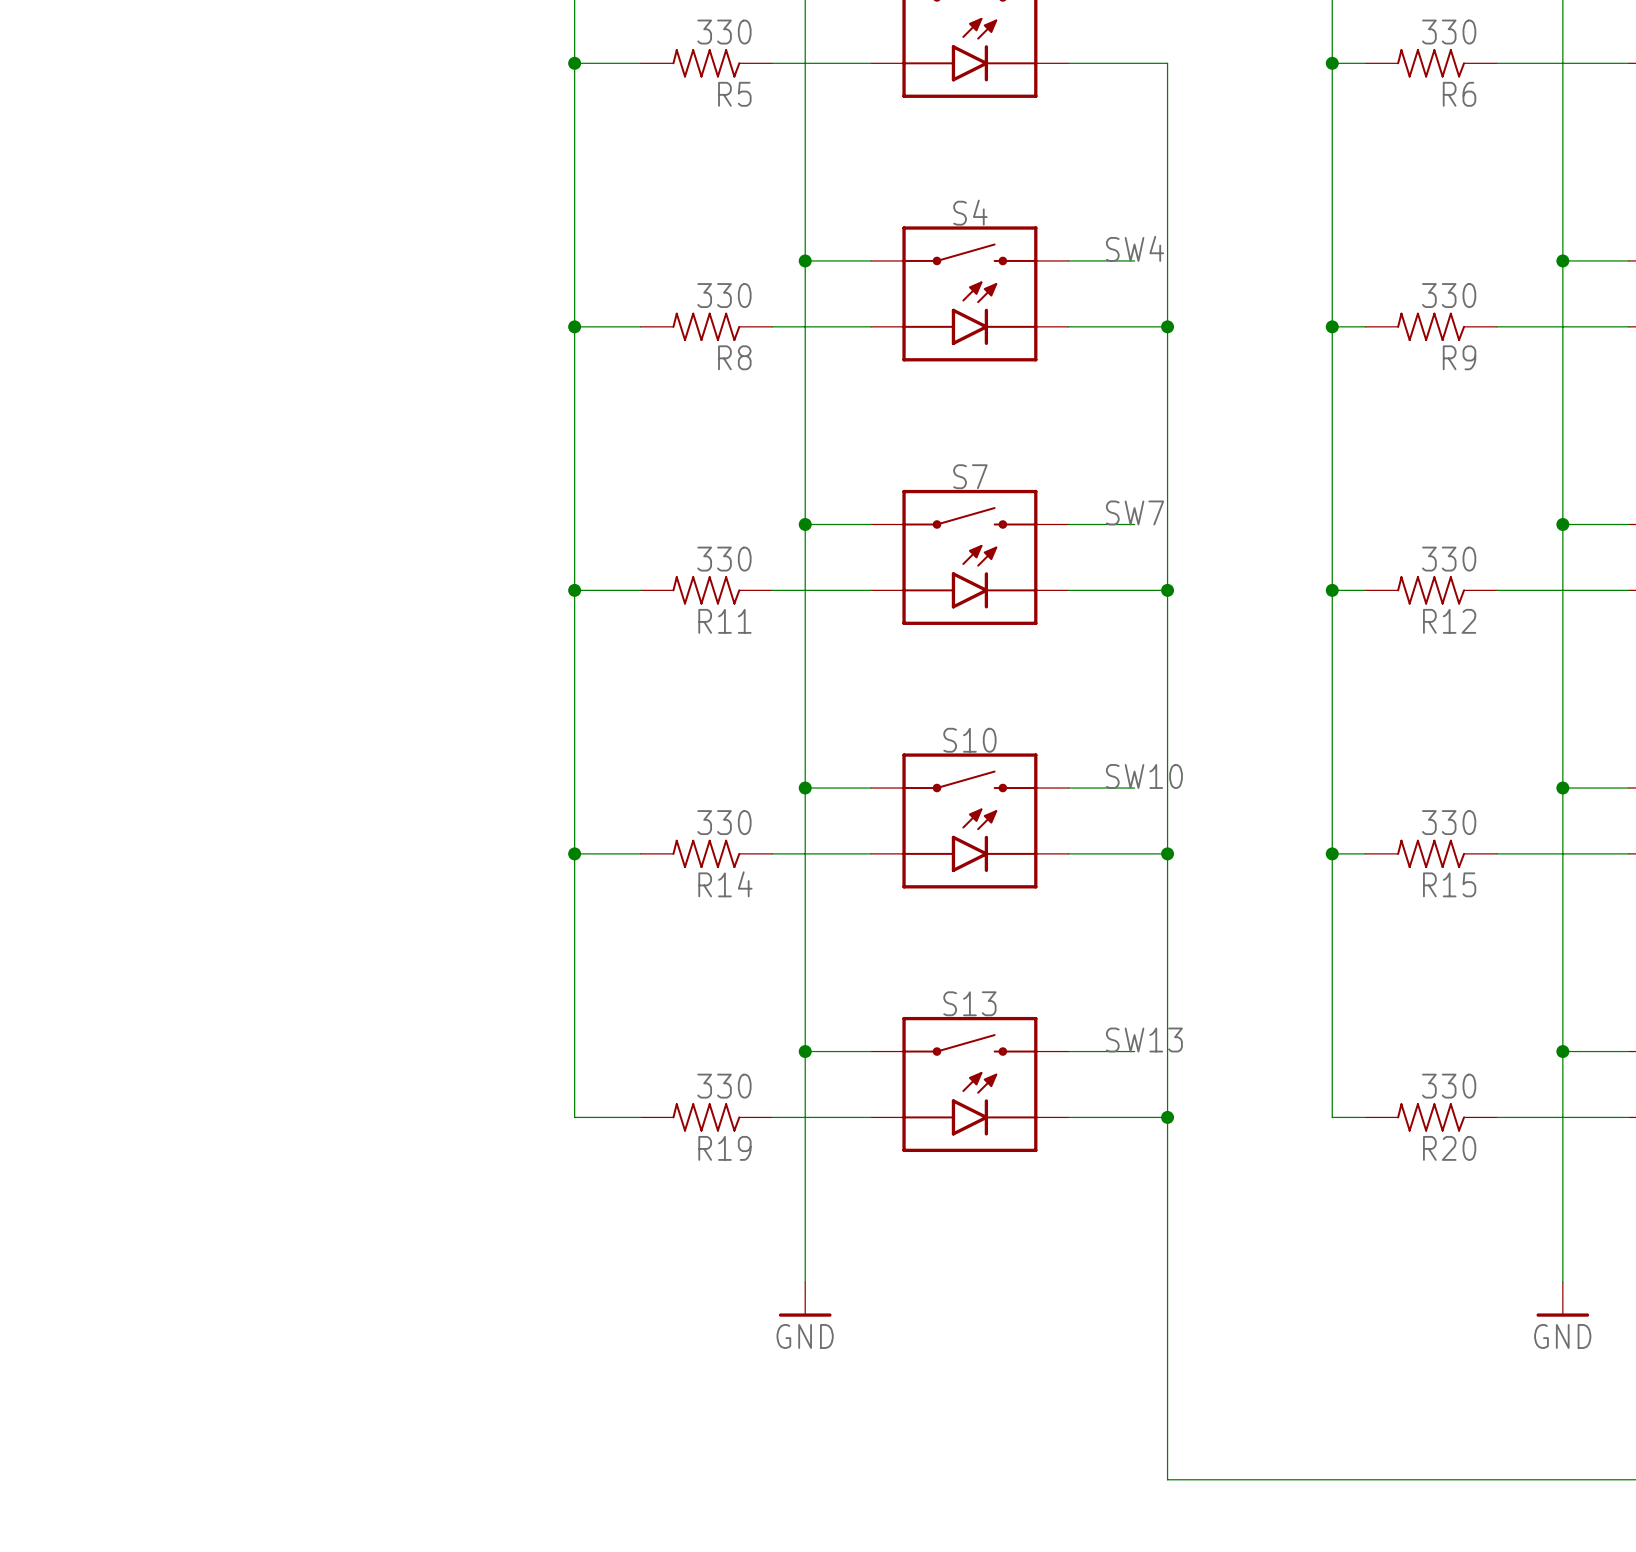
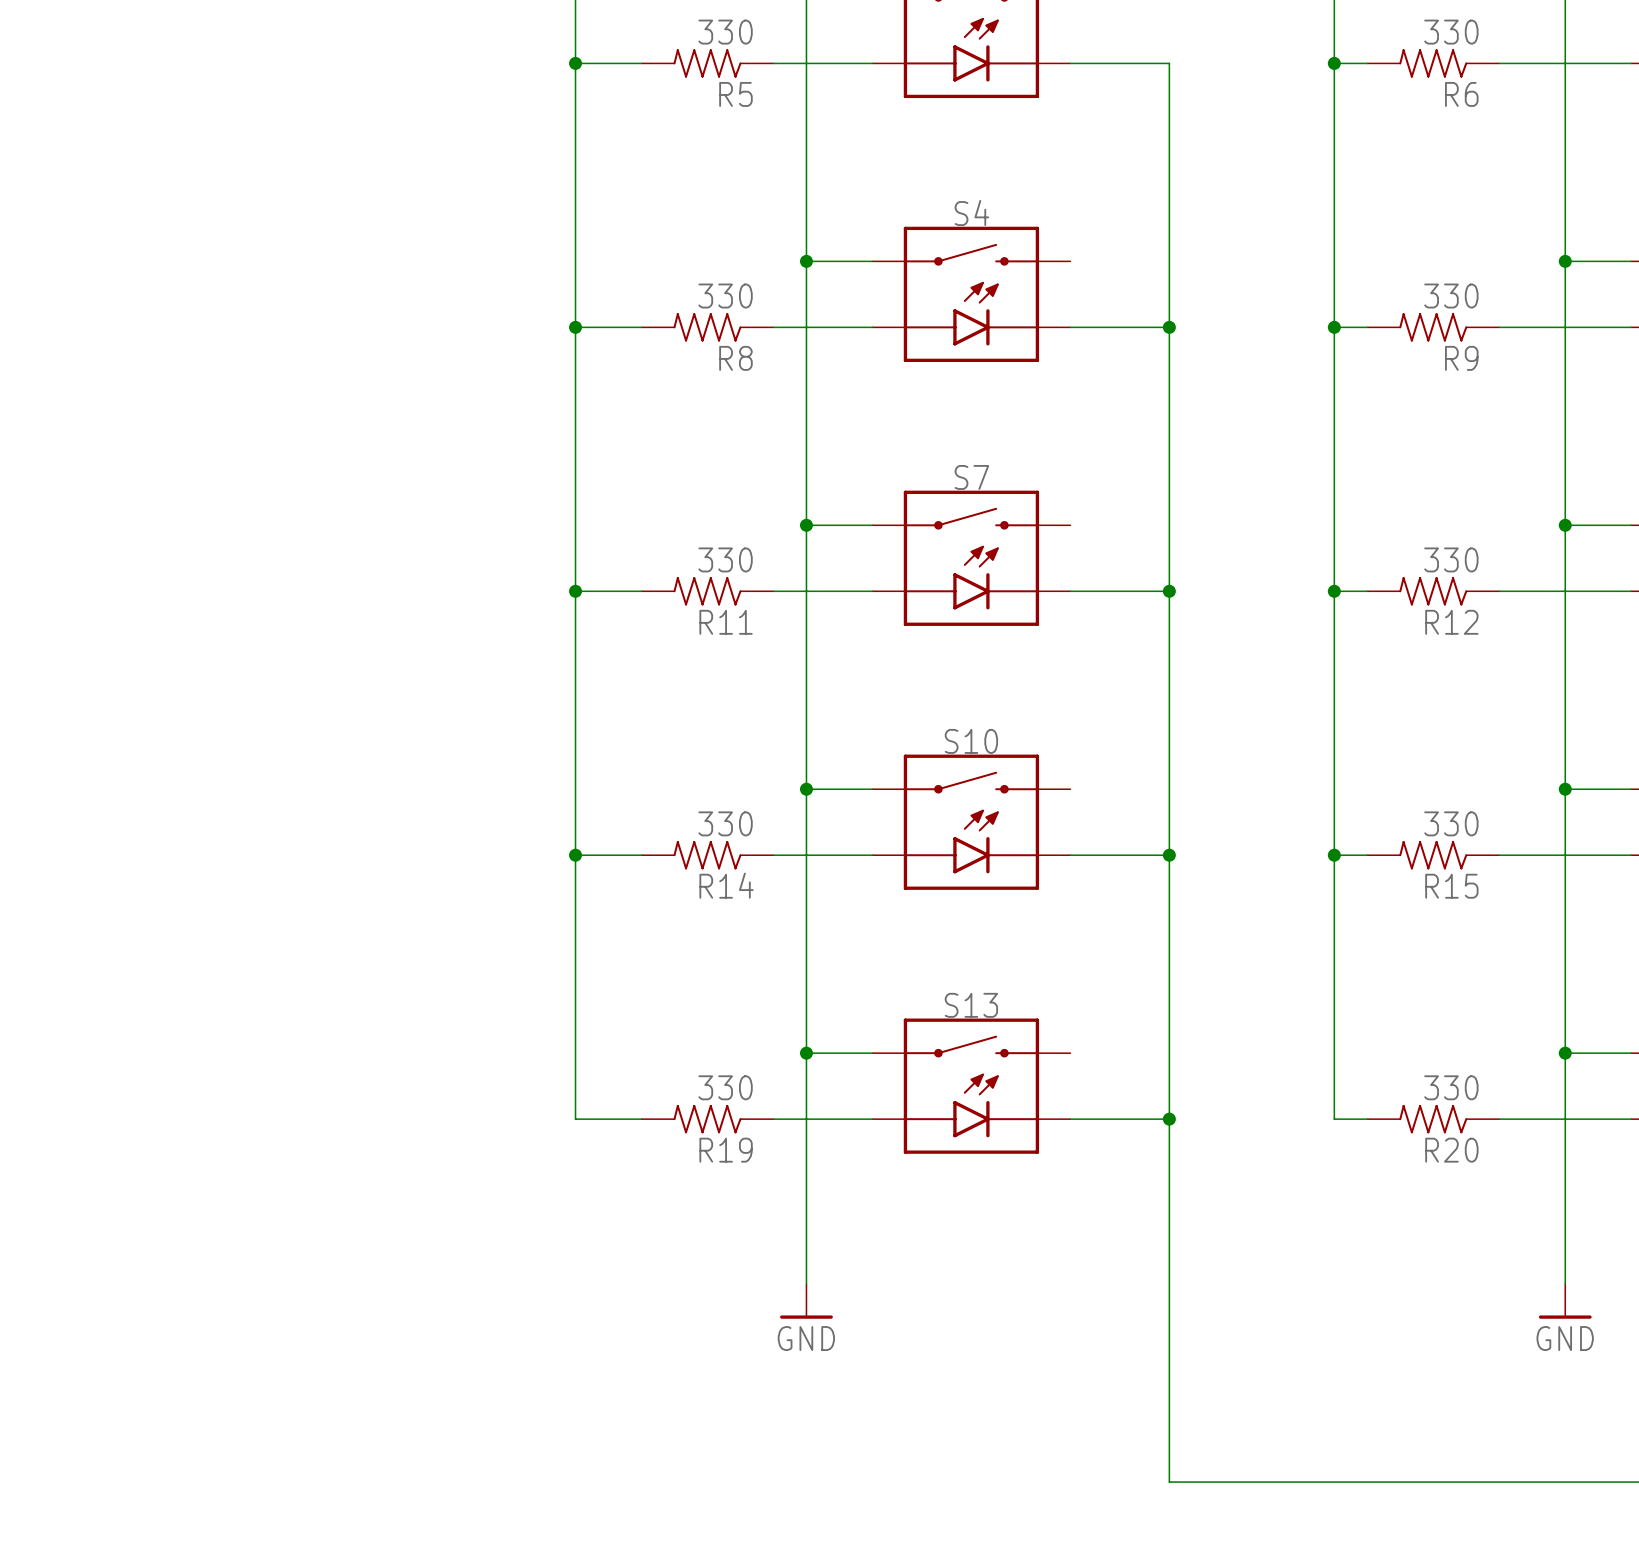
label: SW4 (1135, 248) -> none
wire: (1068, 260) (1134, 260) -> none
label: SW7 (1135, 512) -> none
wire: (1068, 524) (1134, 524) -> none
label: SW10 (1144, 776) -> none
wire: (1068, 788) (1134, 788) -> none
label: SW13 (1144, 1040) -> none
wire: (1068, 1051) (1134, 1051) -> none

